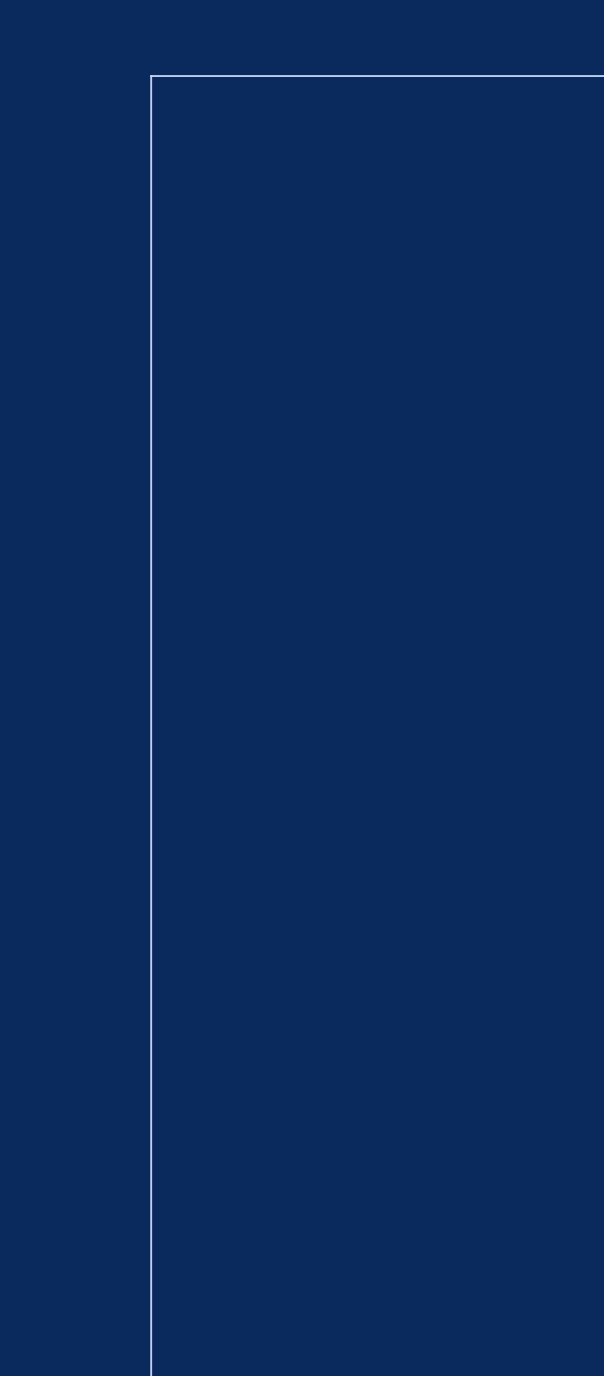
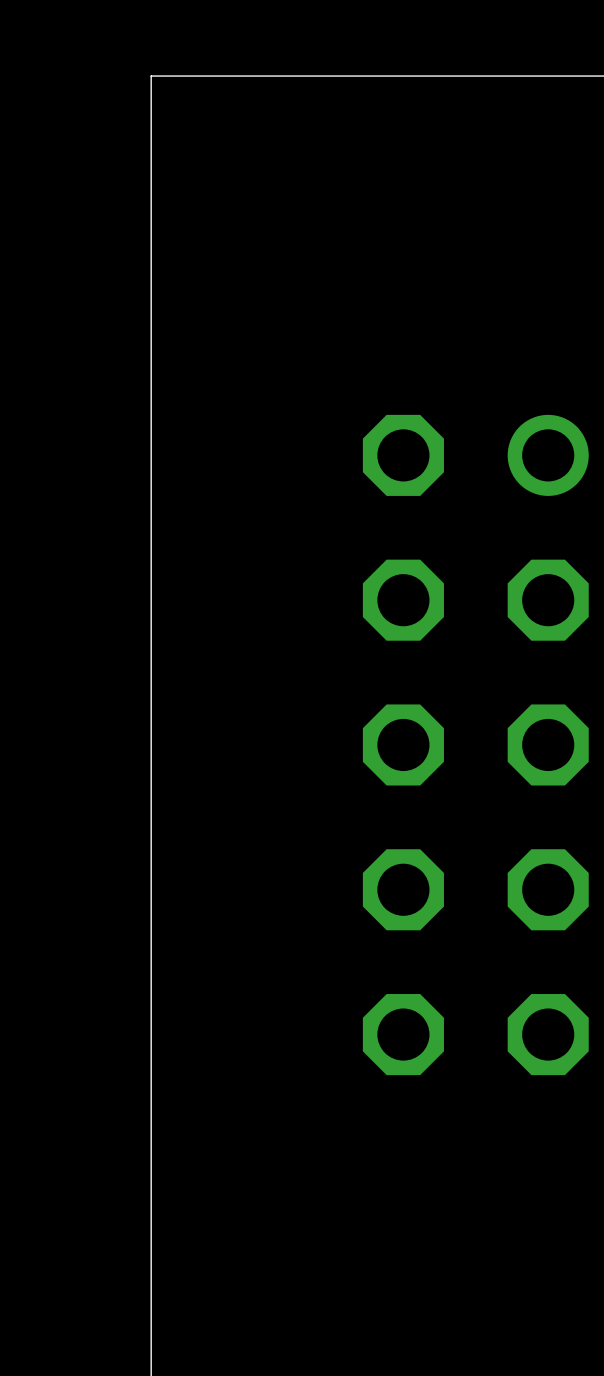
part: none -> (475, 744)

